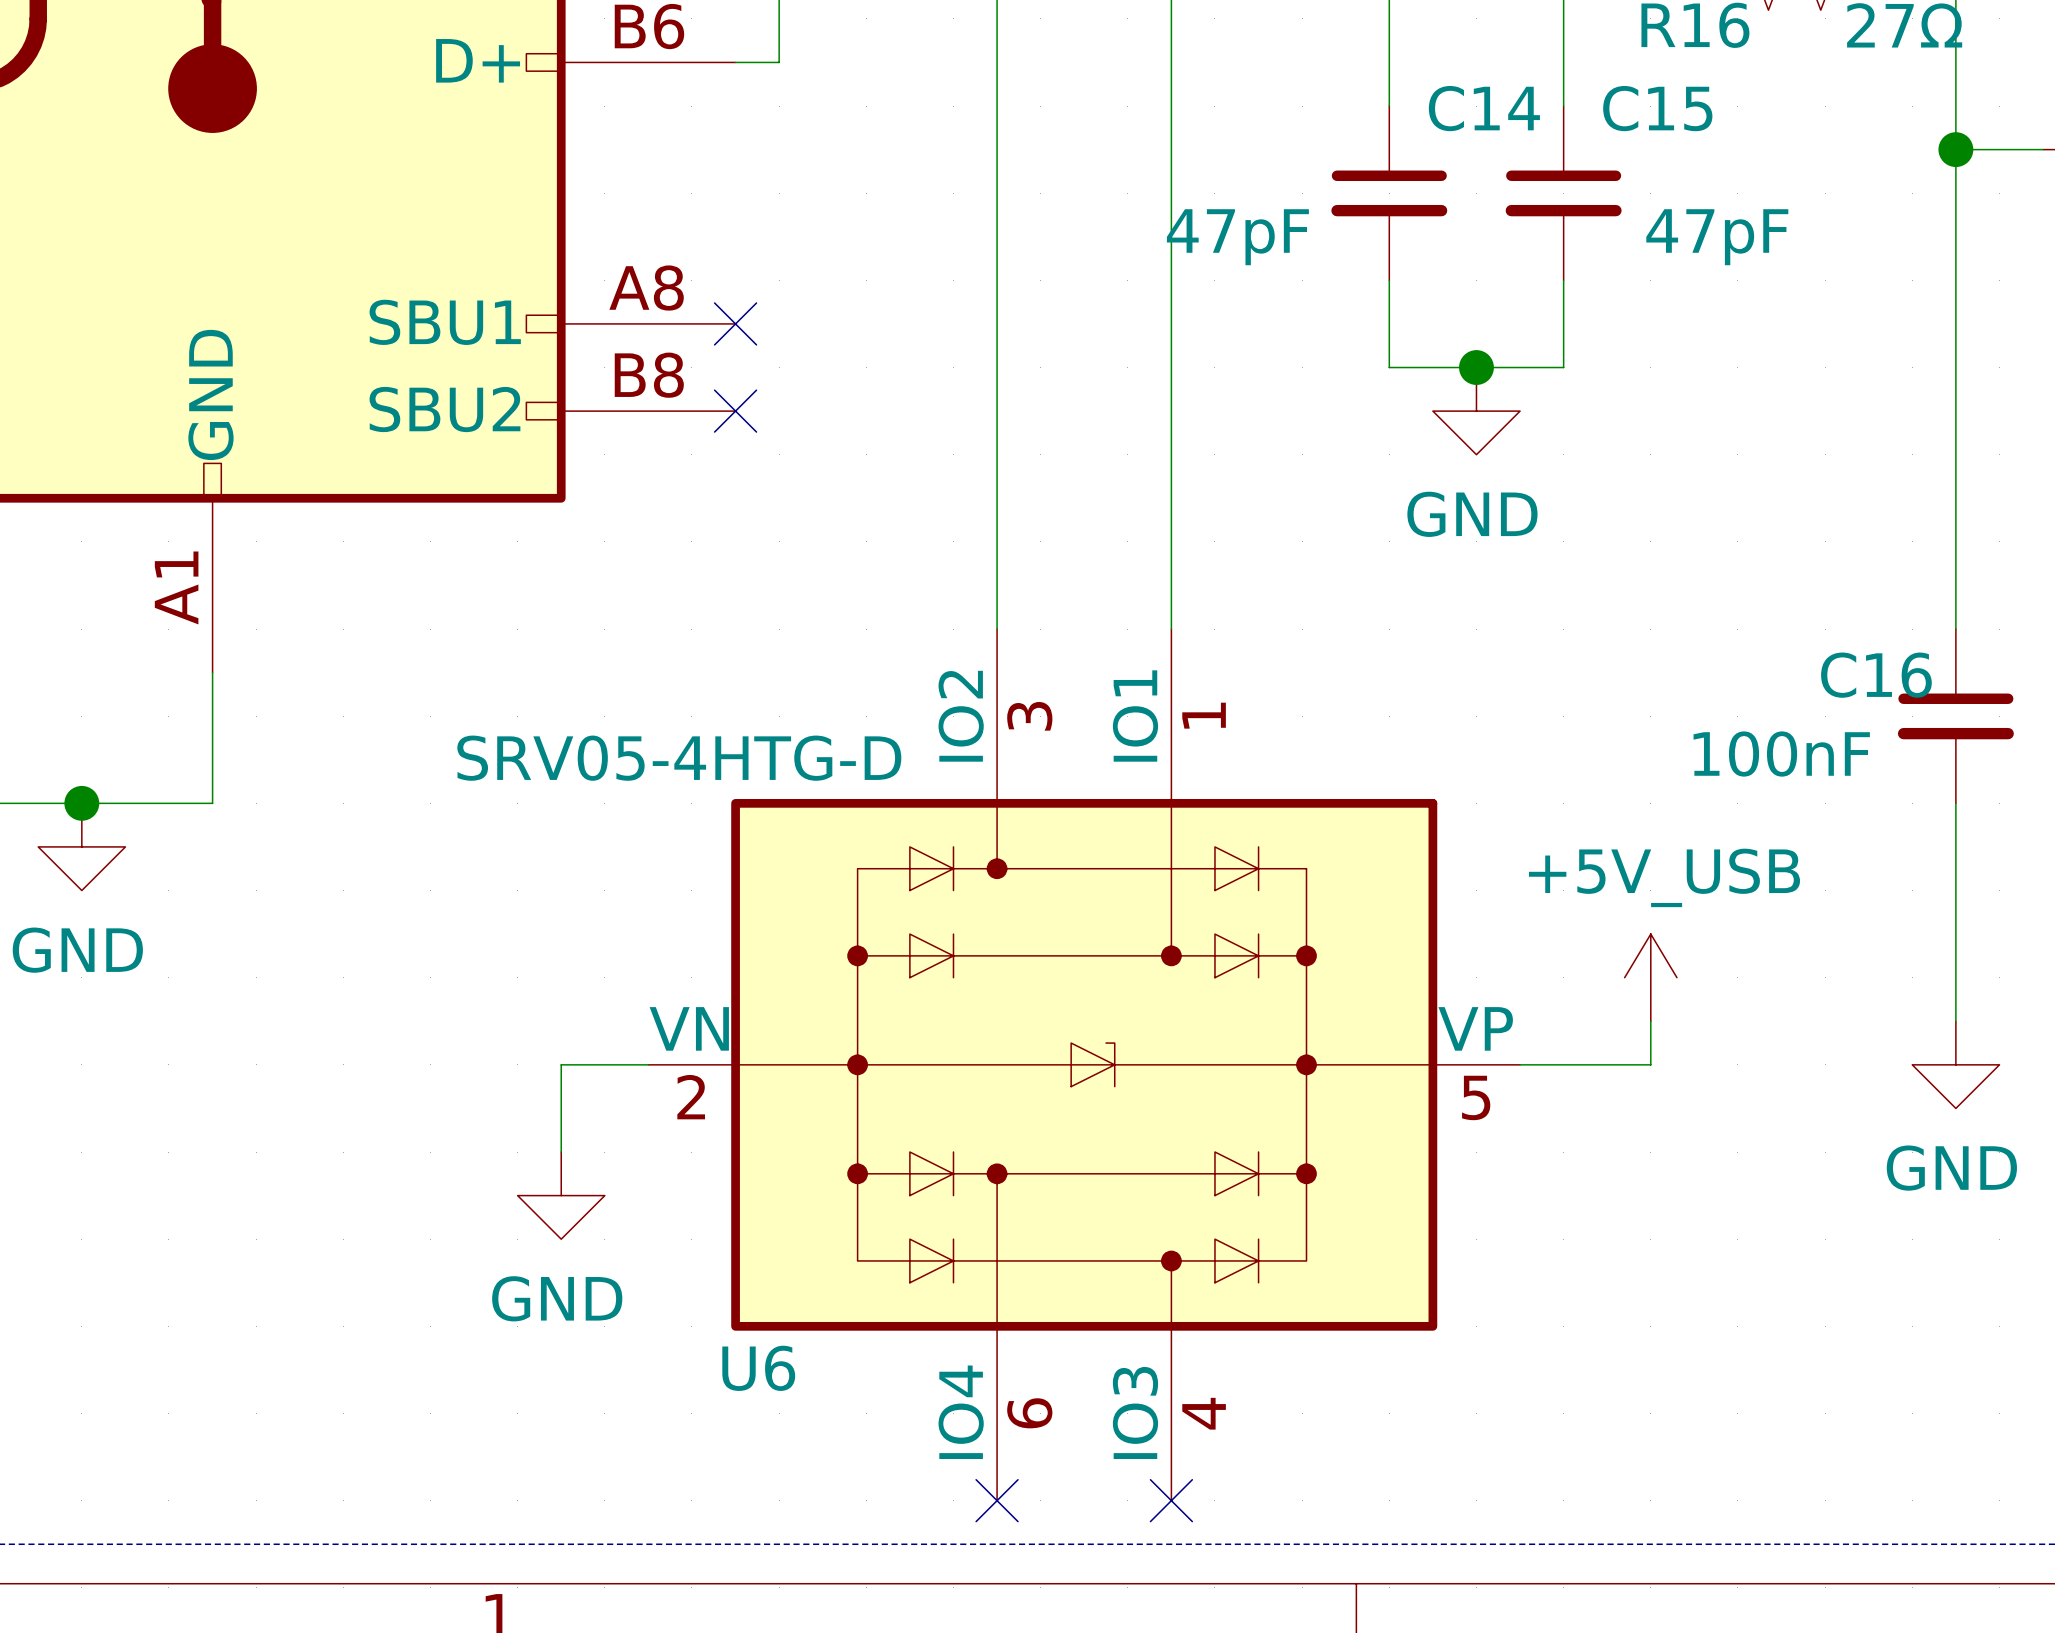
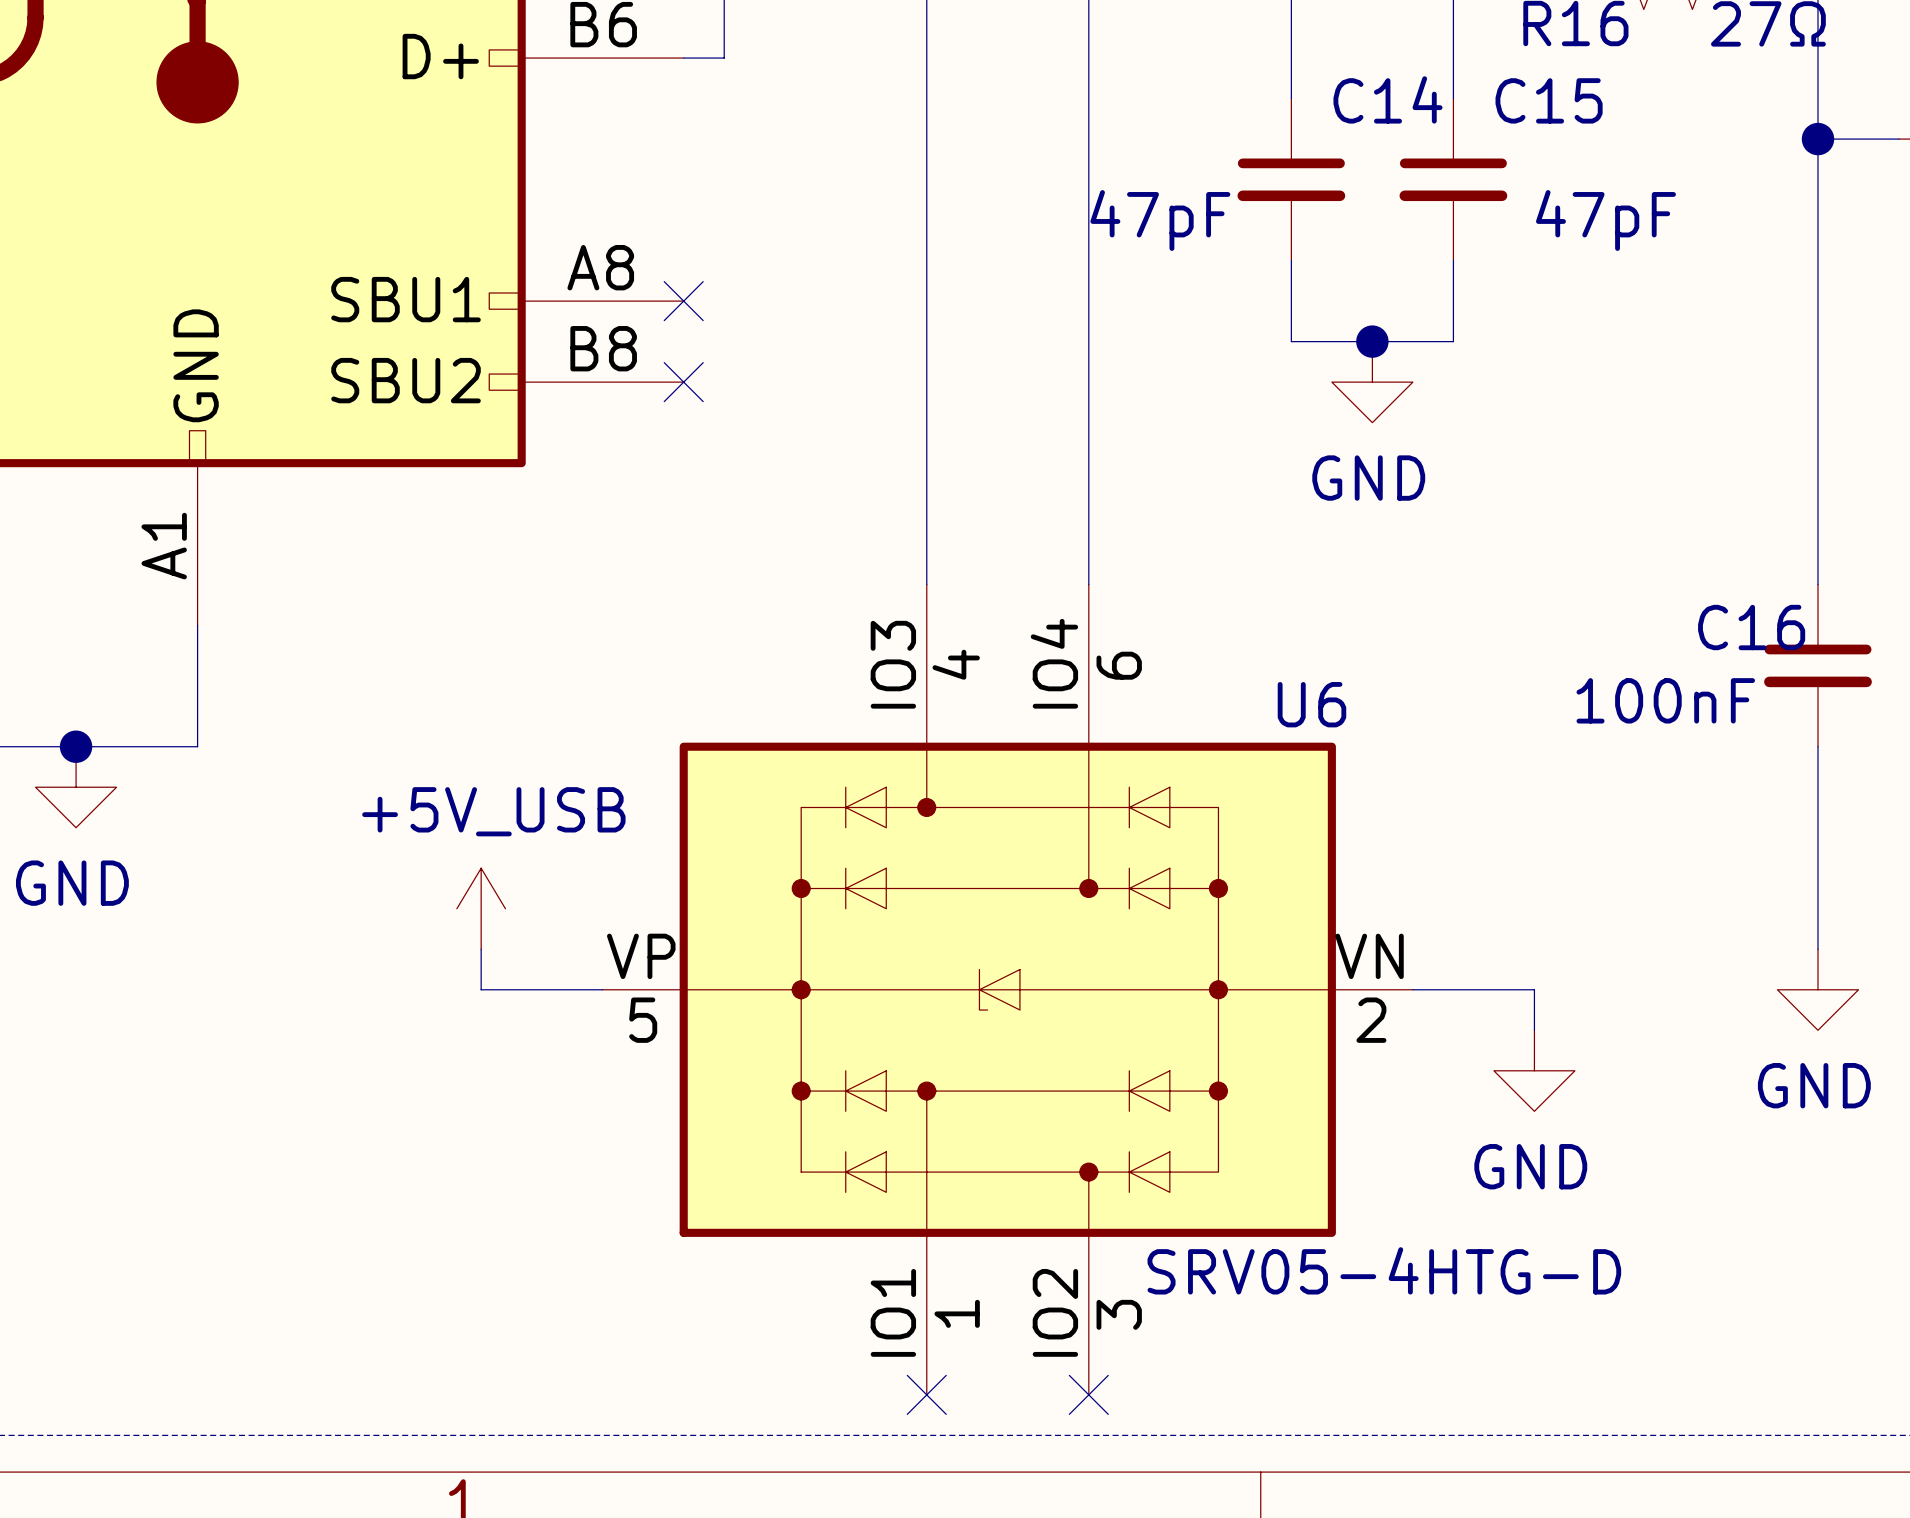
power symbol: none -> +5V_USB (481, 908)
power symbol: +5V_USB (1650, 977) -> none
wire: (1650, 1021) (1650, 1064) -> (1534, 1030) (1534, 989)
wire: (561, 1064) (561, 1152) -> (521, 989) (481, 989) (481, 949)
U6 rotation: 0° (1084, 1064) -> 180° (1007, 989)
power symbol: none -> GND (1534, 1070)
power symbol: GND (561, 1195) -> none

